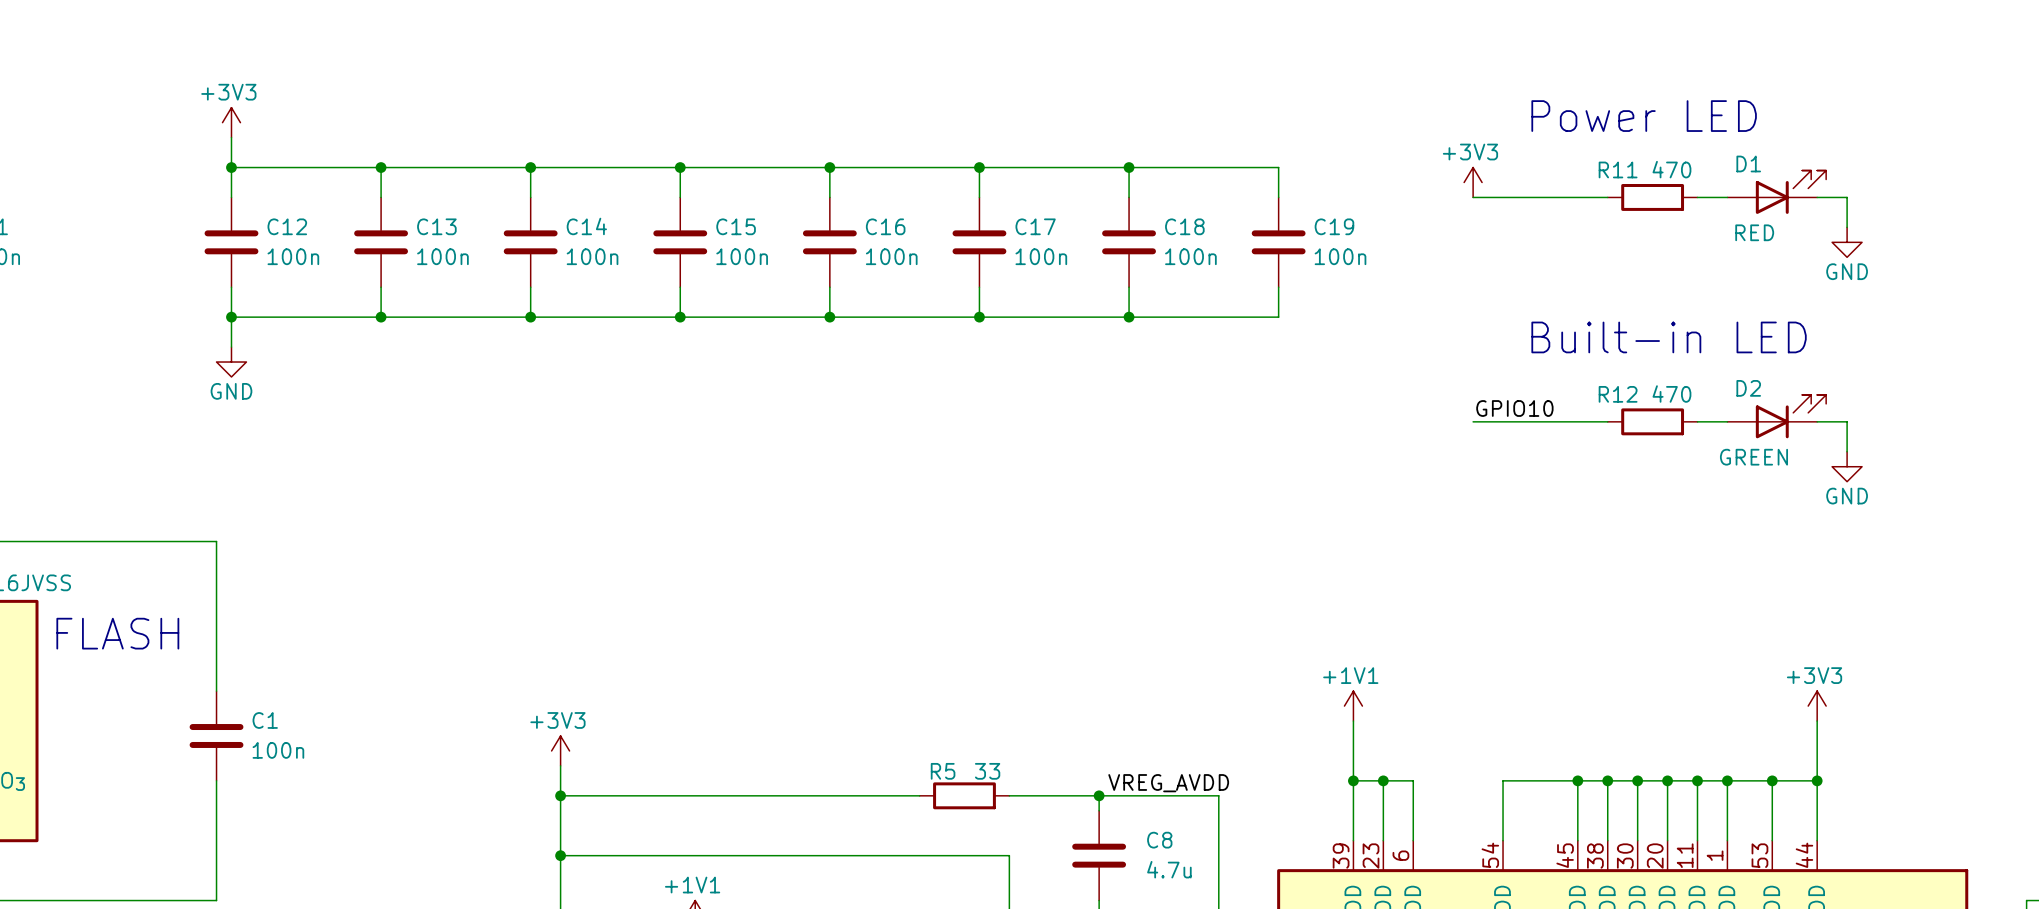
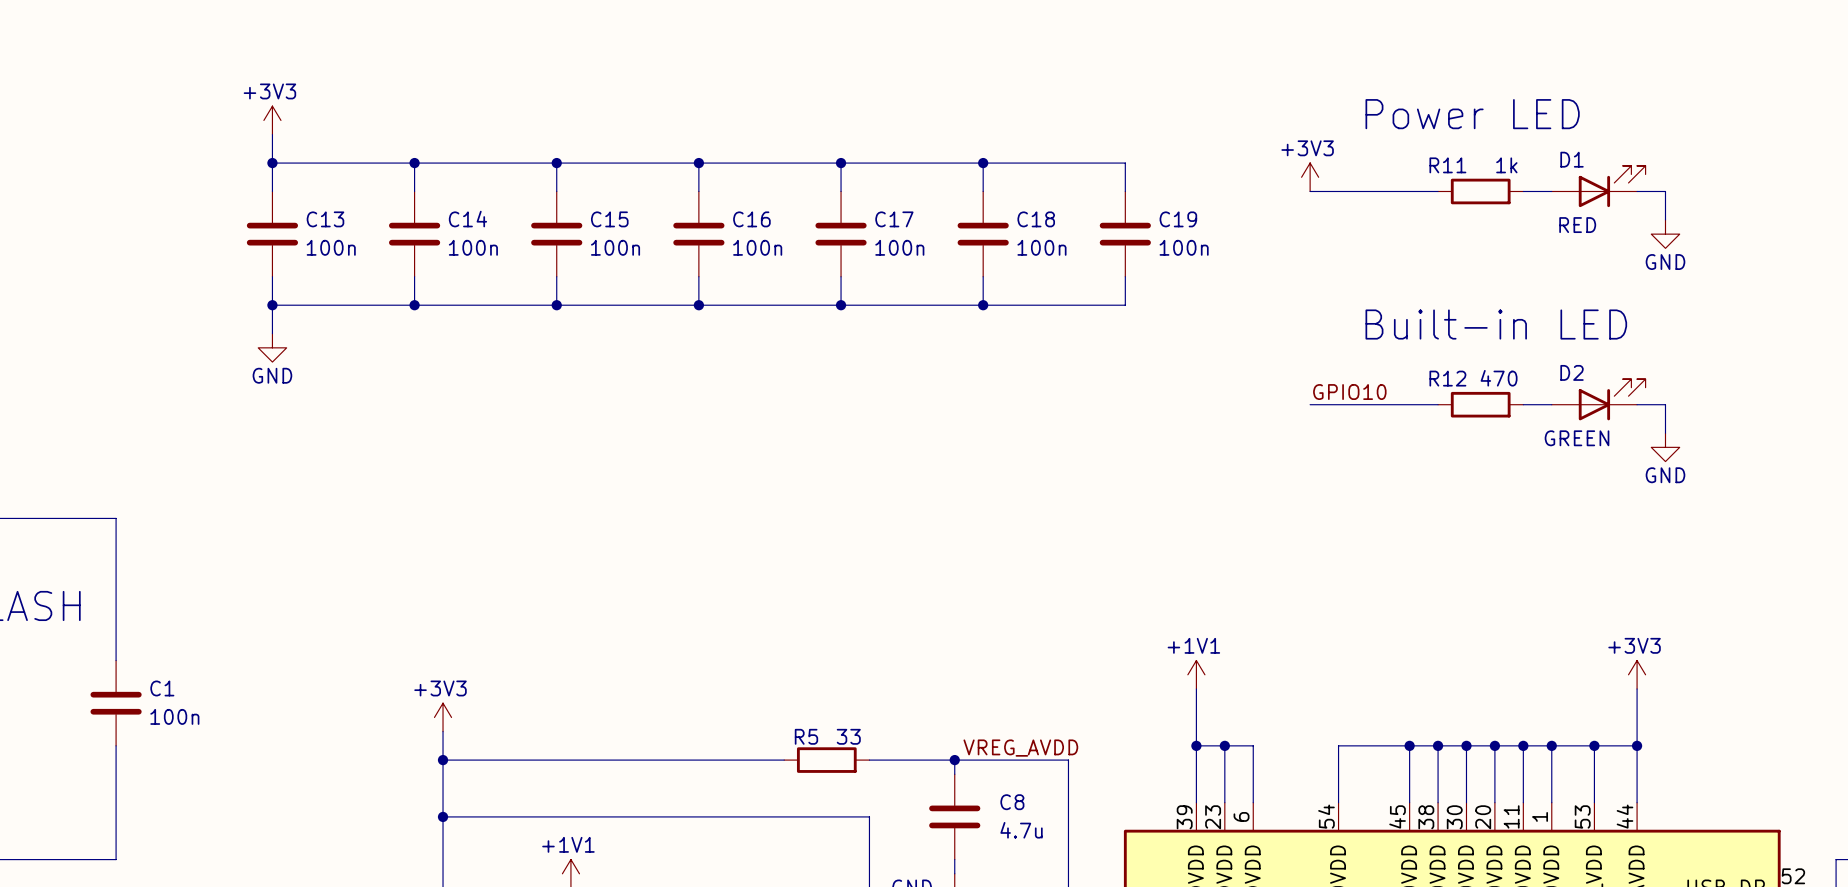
power symbol position: +3V3 (231, 122) -> +3V3 (272, 120)
wire: (231, 137) (231, 197) -> none
wire: (231, 167) (381, 167) -> (272, 134) (272, 163)
junction: (231, 167) -> none
R11 value: 470 (1671, 169) -> 1k (1506, 165)
C12: 100n (231, 242) -> none
wire: (231, 287) (231, 347) -> none
wire: (231, 317) (381, 317) -> (272, 333) (272, 305)
junction: (231, 317) -> none
power symbol position: GND (231, 362) -> GND (272, 347)

